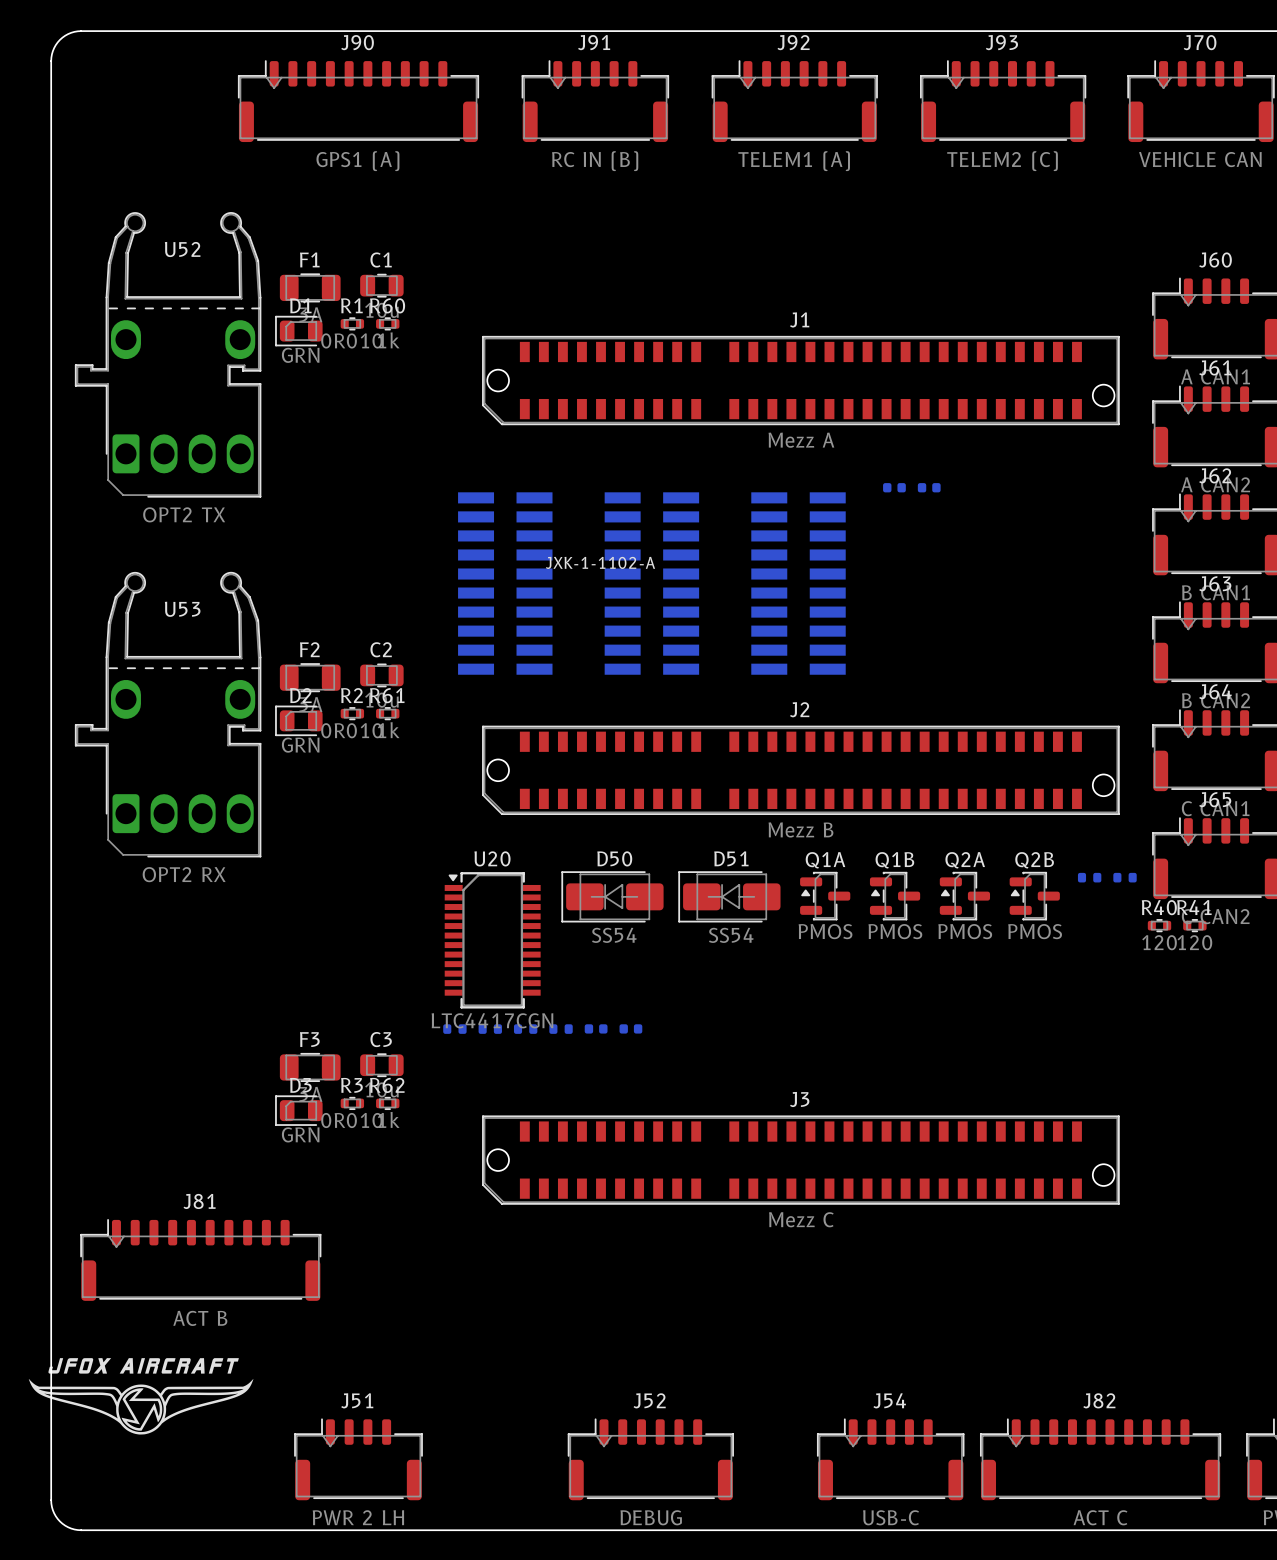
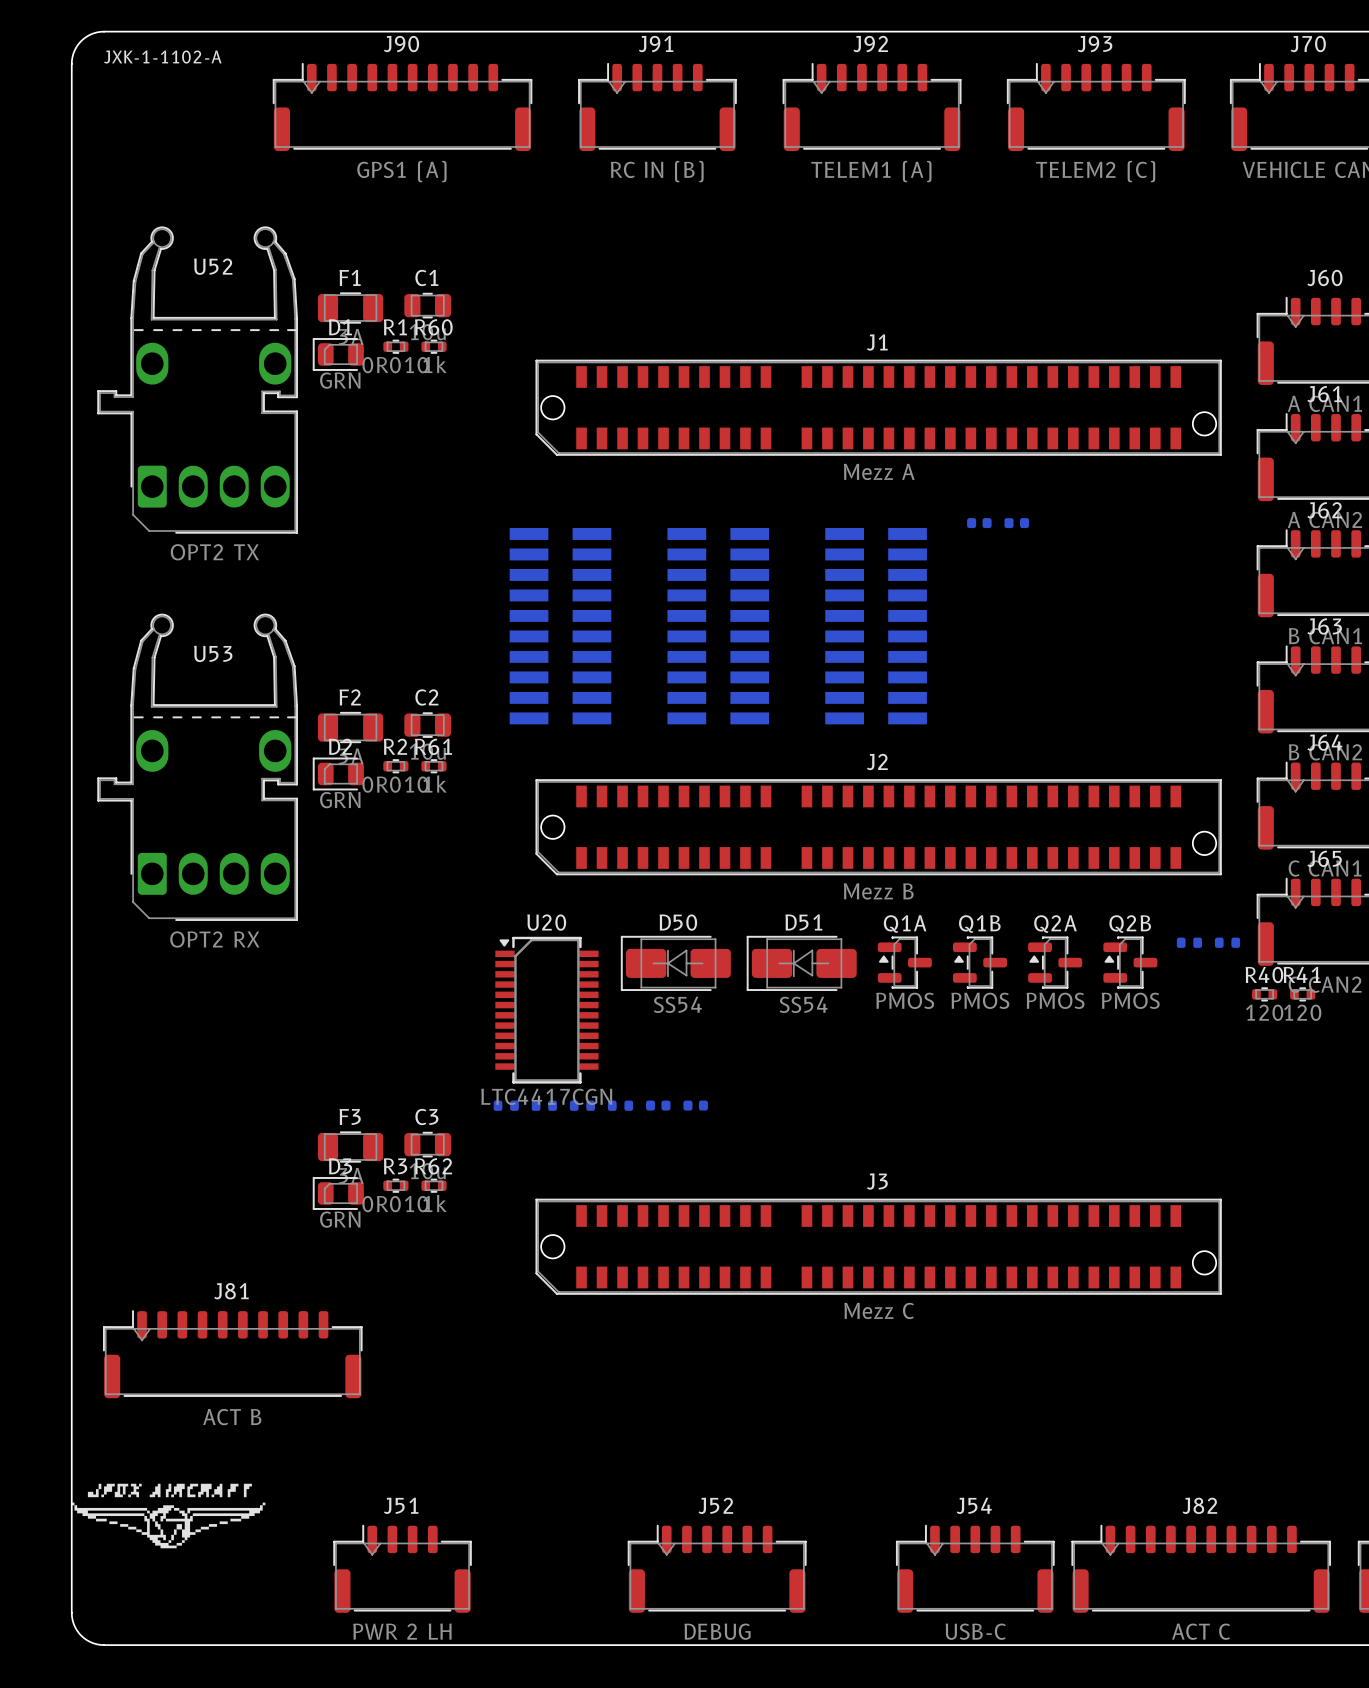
text: none -> JXK-1-1102-A (162, 57)
text: JXK-1-1102-A (600, 562) -> none
drawing shape: [28, 1358, 254, 1435] -> [71, 1483, 266, 1549]

